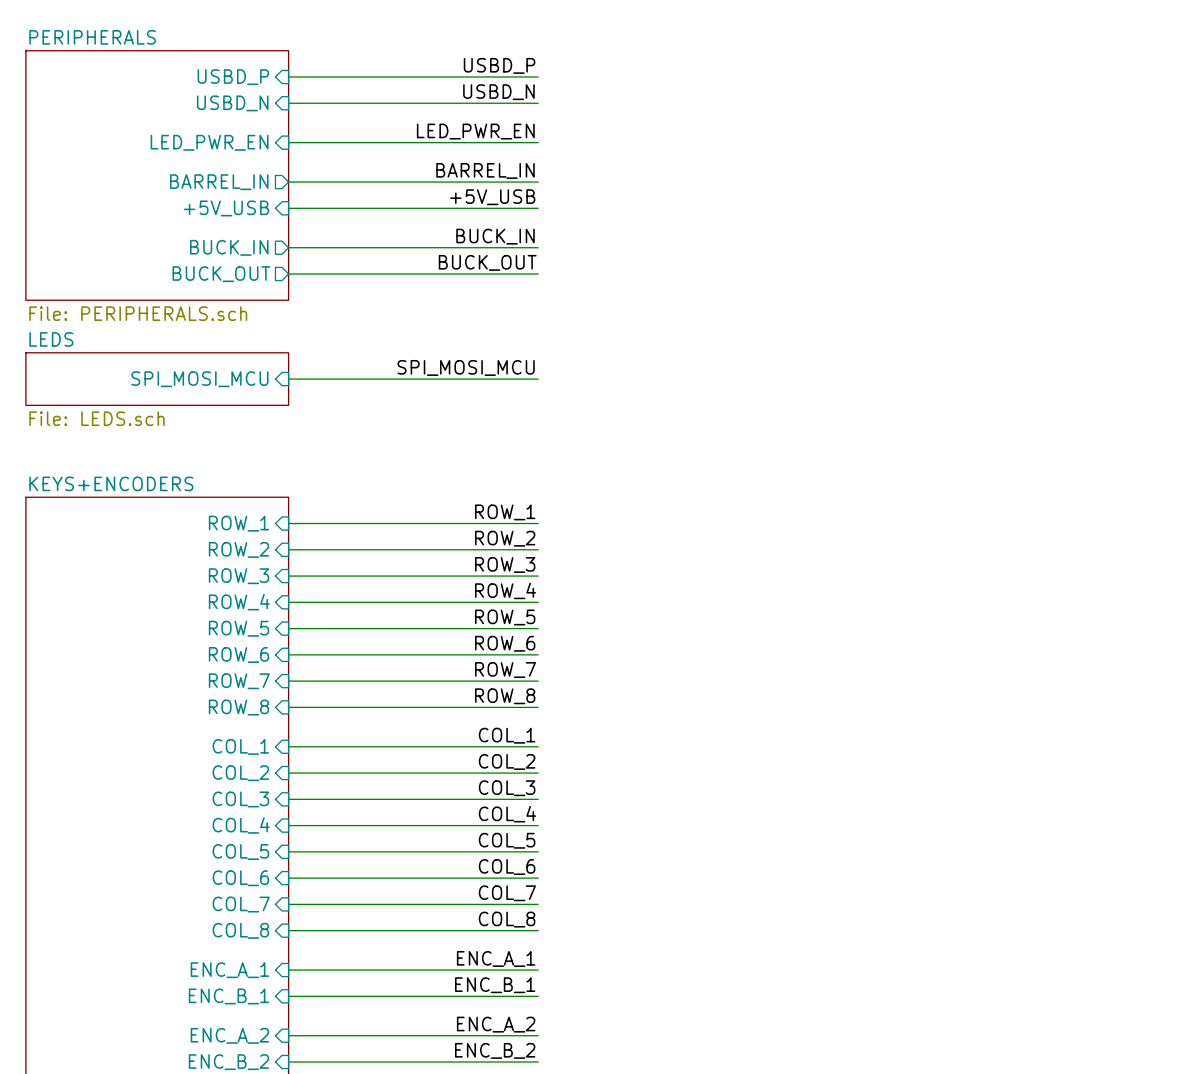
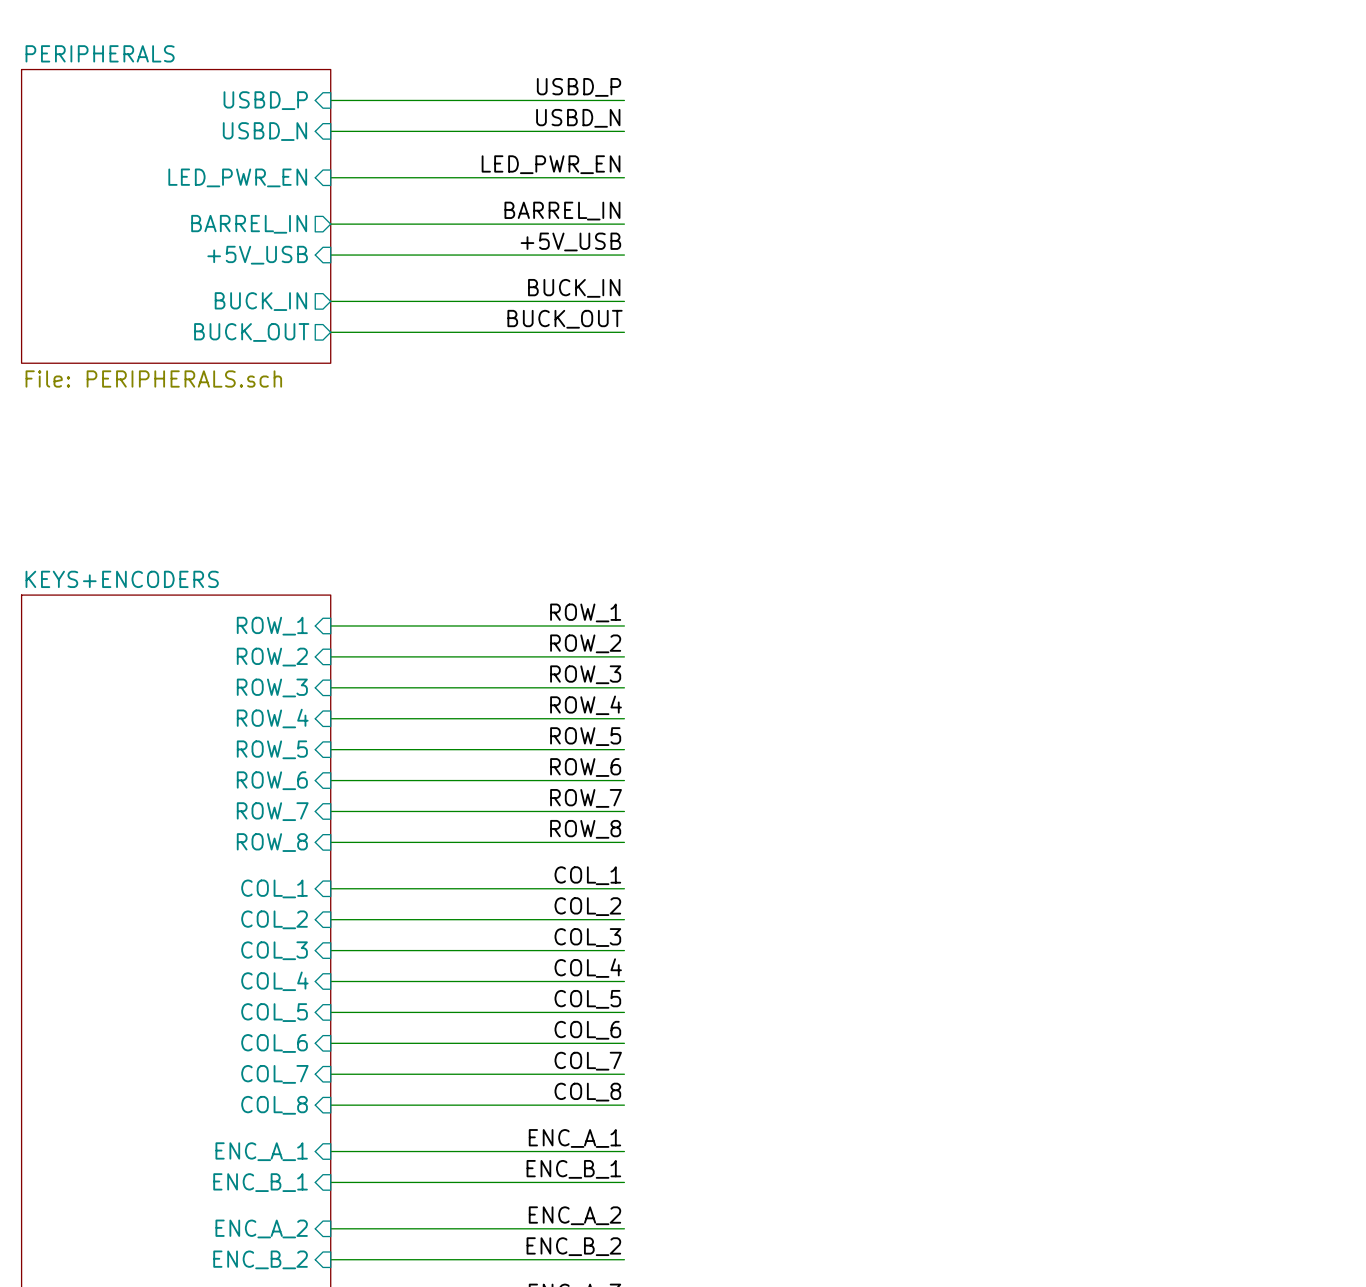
label: SPI_MOSI_MCU (466, 367) -> none
sheet LEDS: File: LEDS.sch (157, 379) -> none
sheet pin: SPI_MOSI_MCU (199, 379) -> none
wire: (288, 379) (538, 379) -> none

